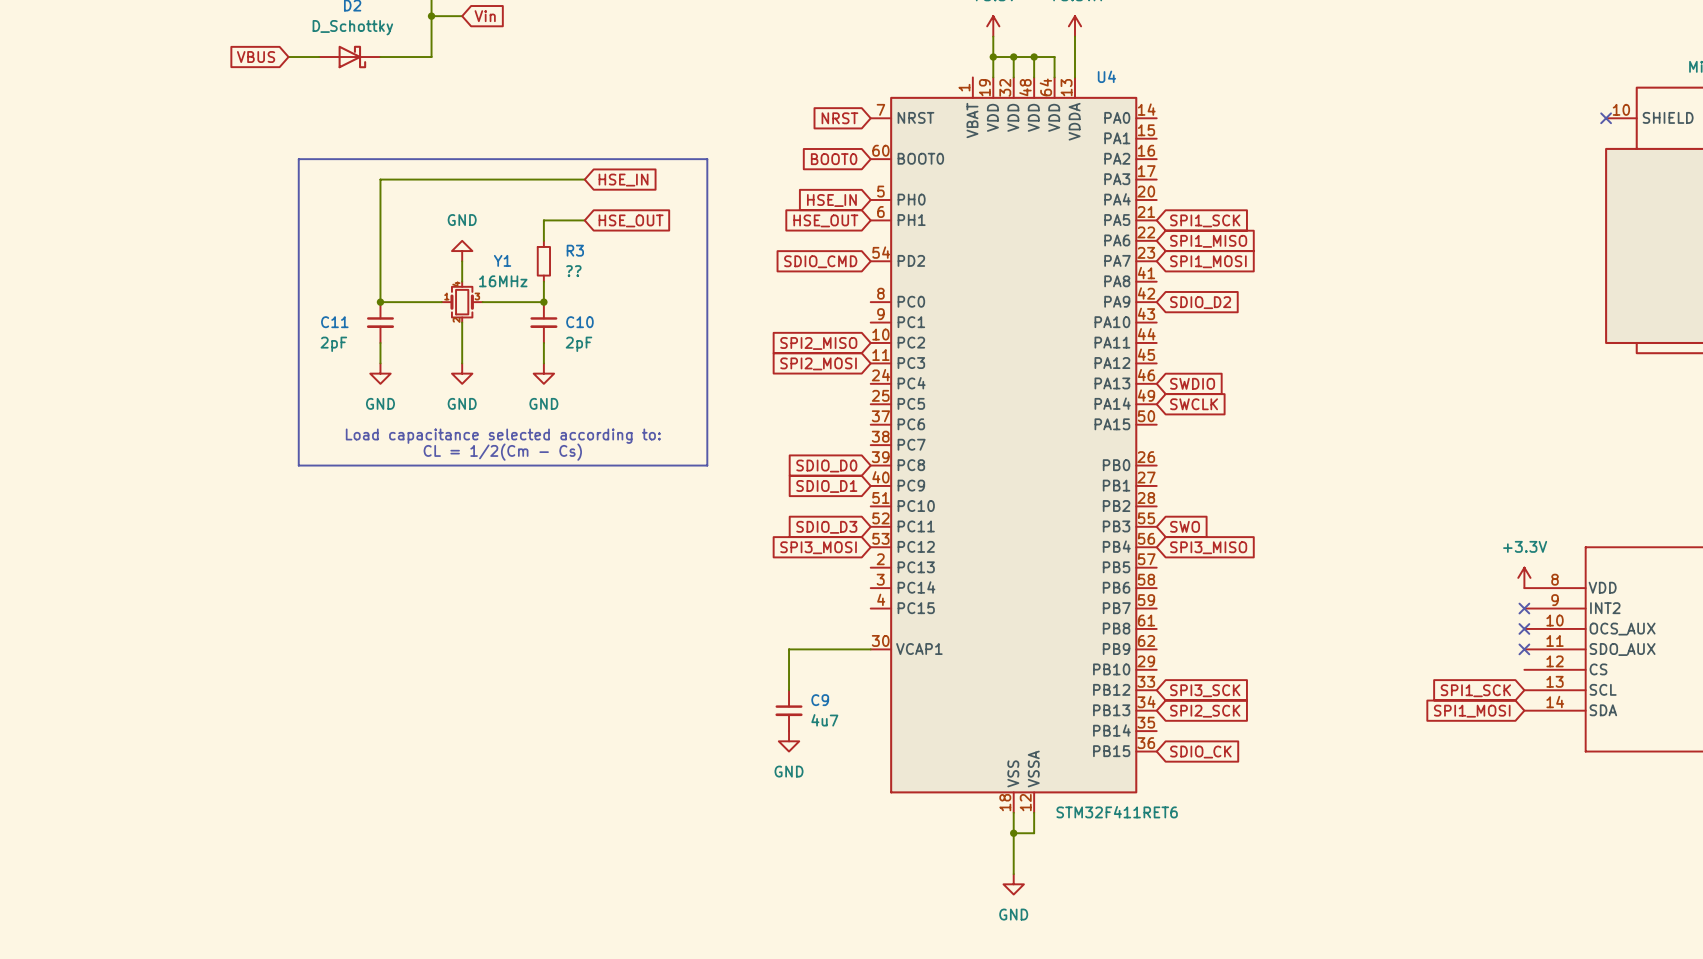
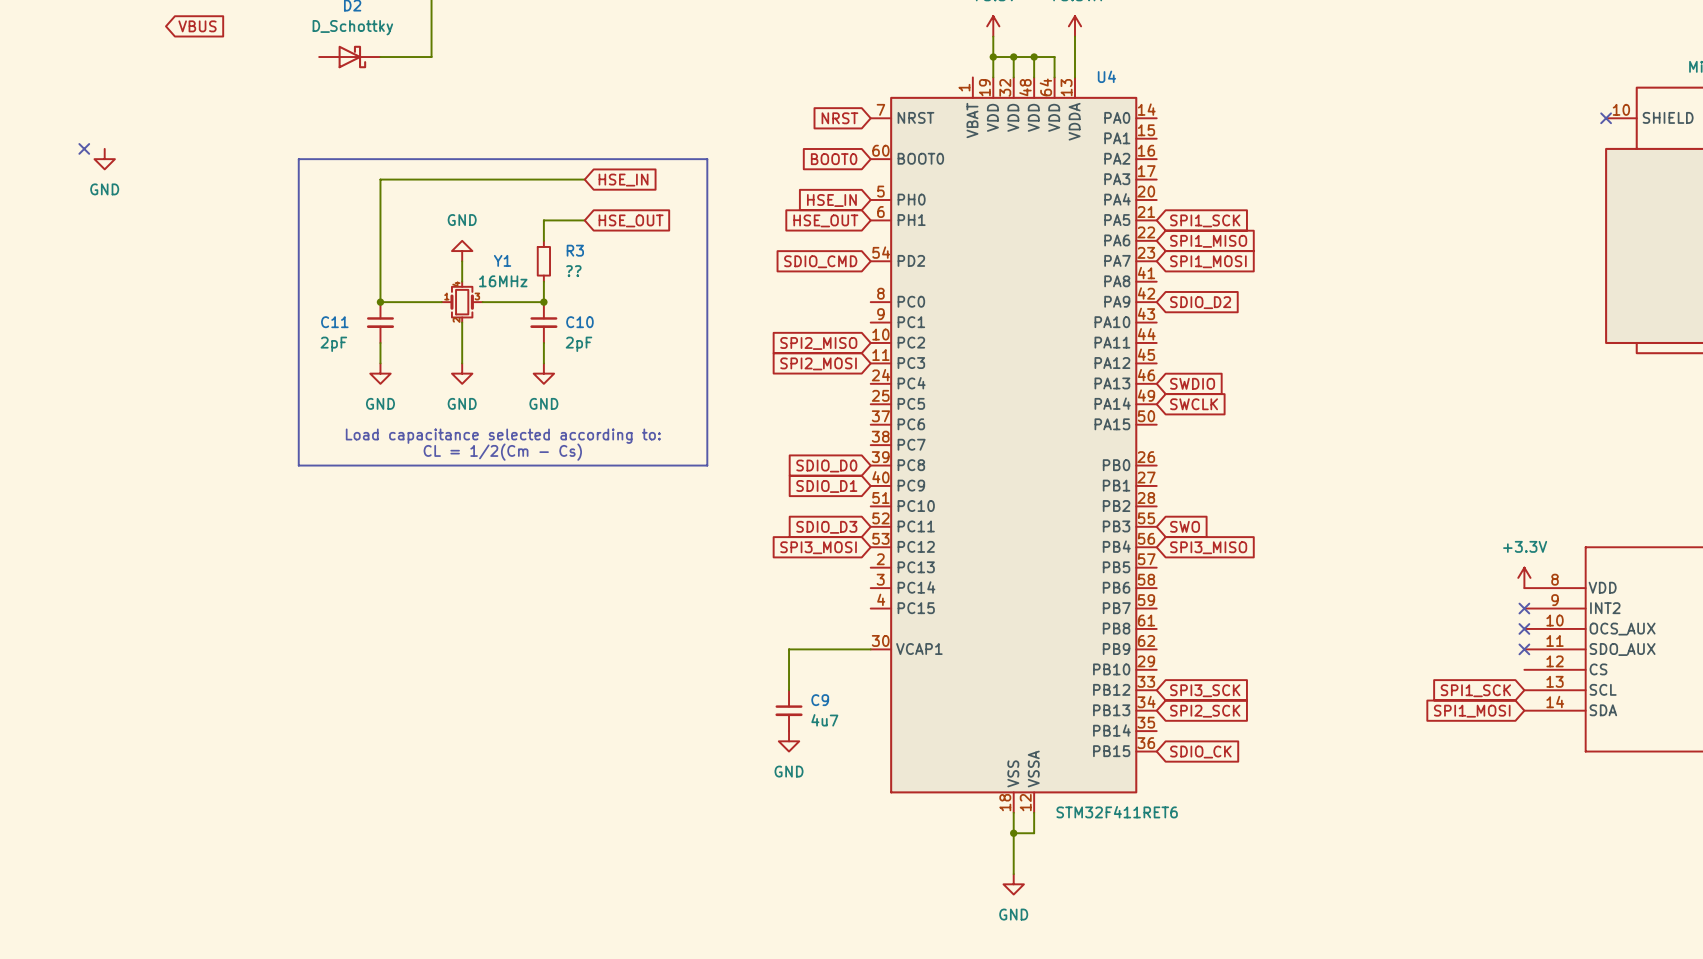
wire: (431, 16) (462, 16) -> none
junction: (431, 16) -> none
global label: Vin (485, 16) -> none
global label rotation: 0° (256, 57) -> 180° (197, 26)
wire: (288, 57) (319, 57) -> none
no-connect mark: none -> (84, 148)
power symbol: none -> GND (104, 159)

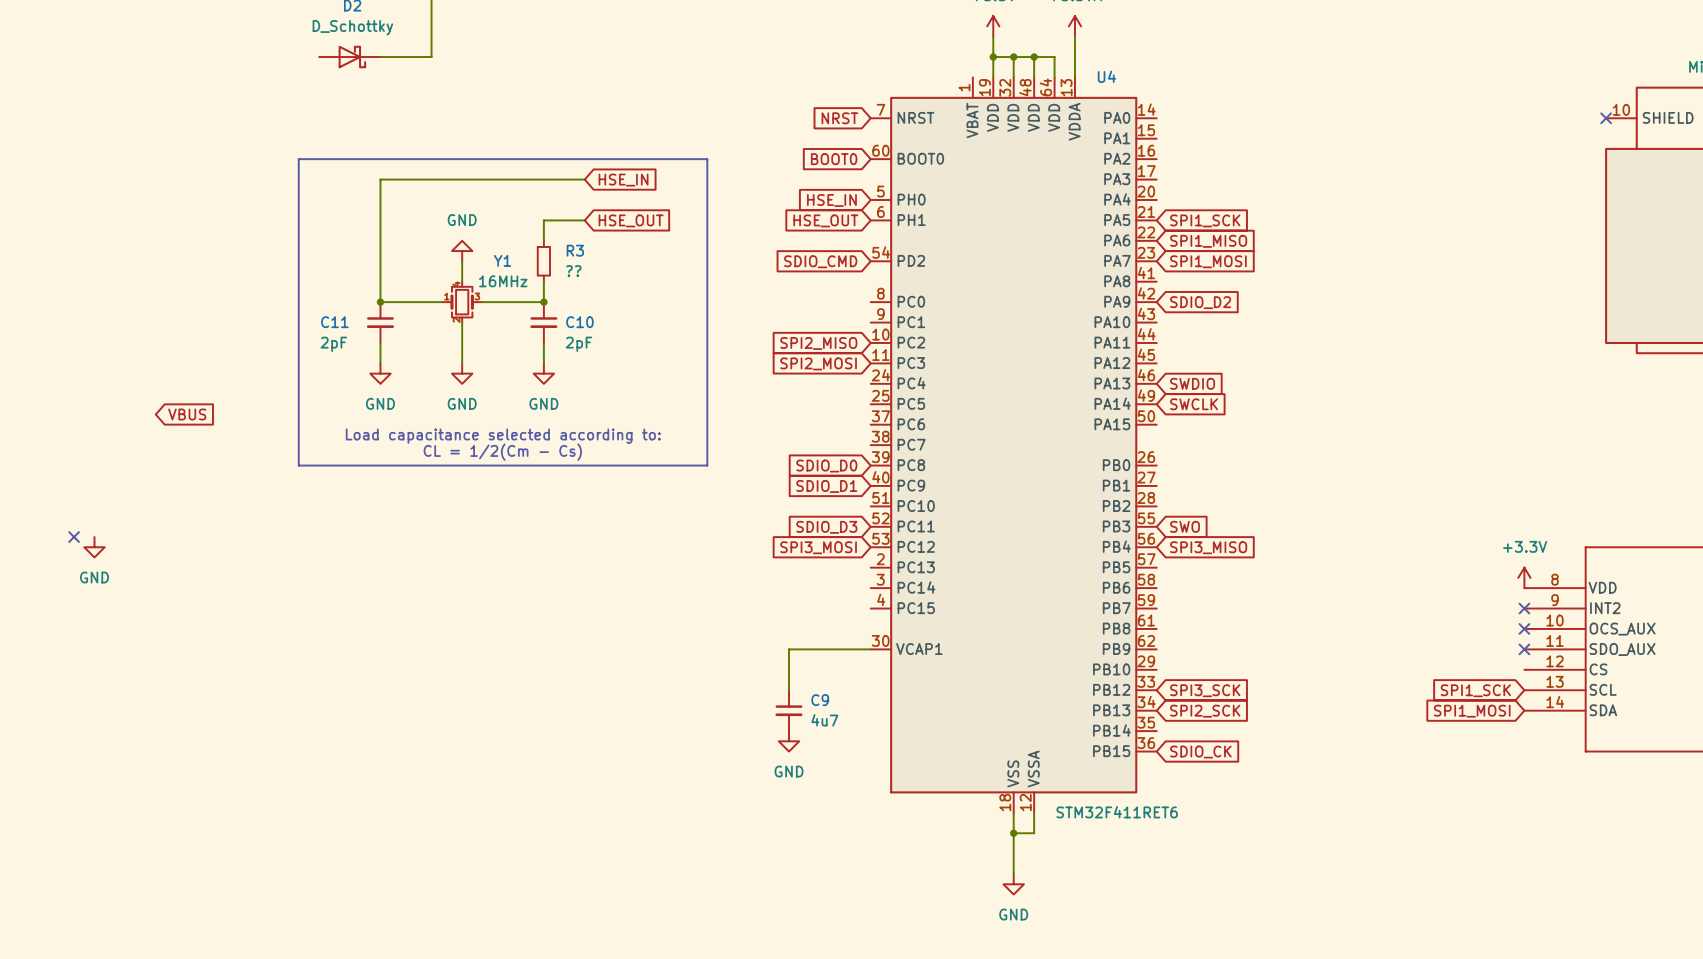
global label: VBUS (197, 26) -> none
no-connect mark: (84, 148) -> none
power symbol: GND (104, 159) -> none
global label: none -> VBUS (187, 414)
no-connect mark: none -> (74, 537)
power symbol: none -> GND (94, 547)

